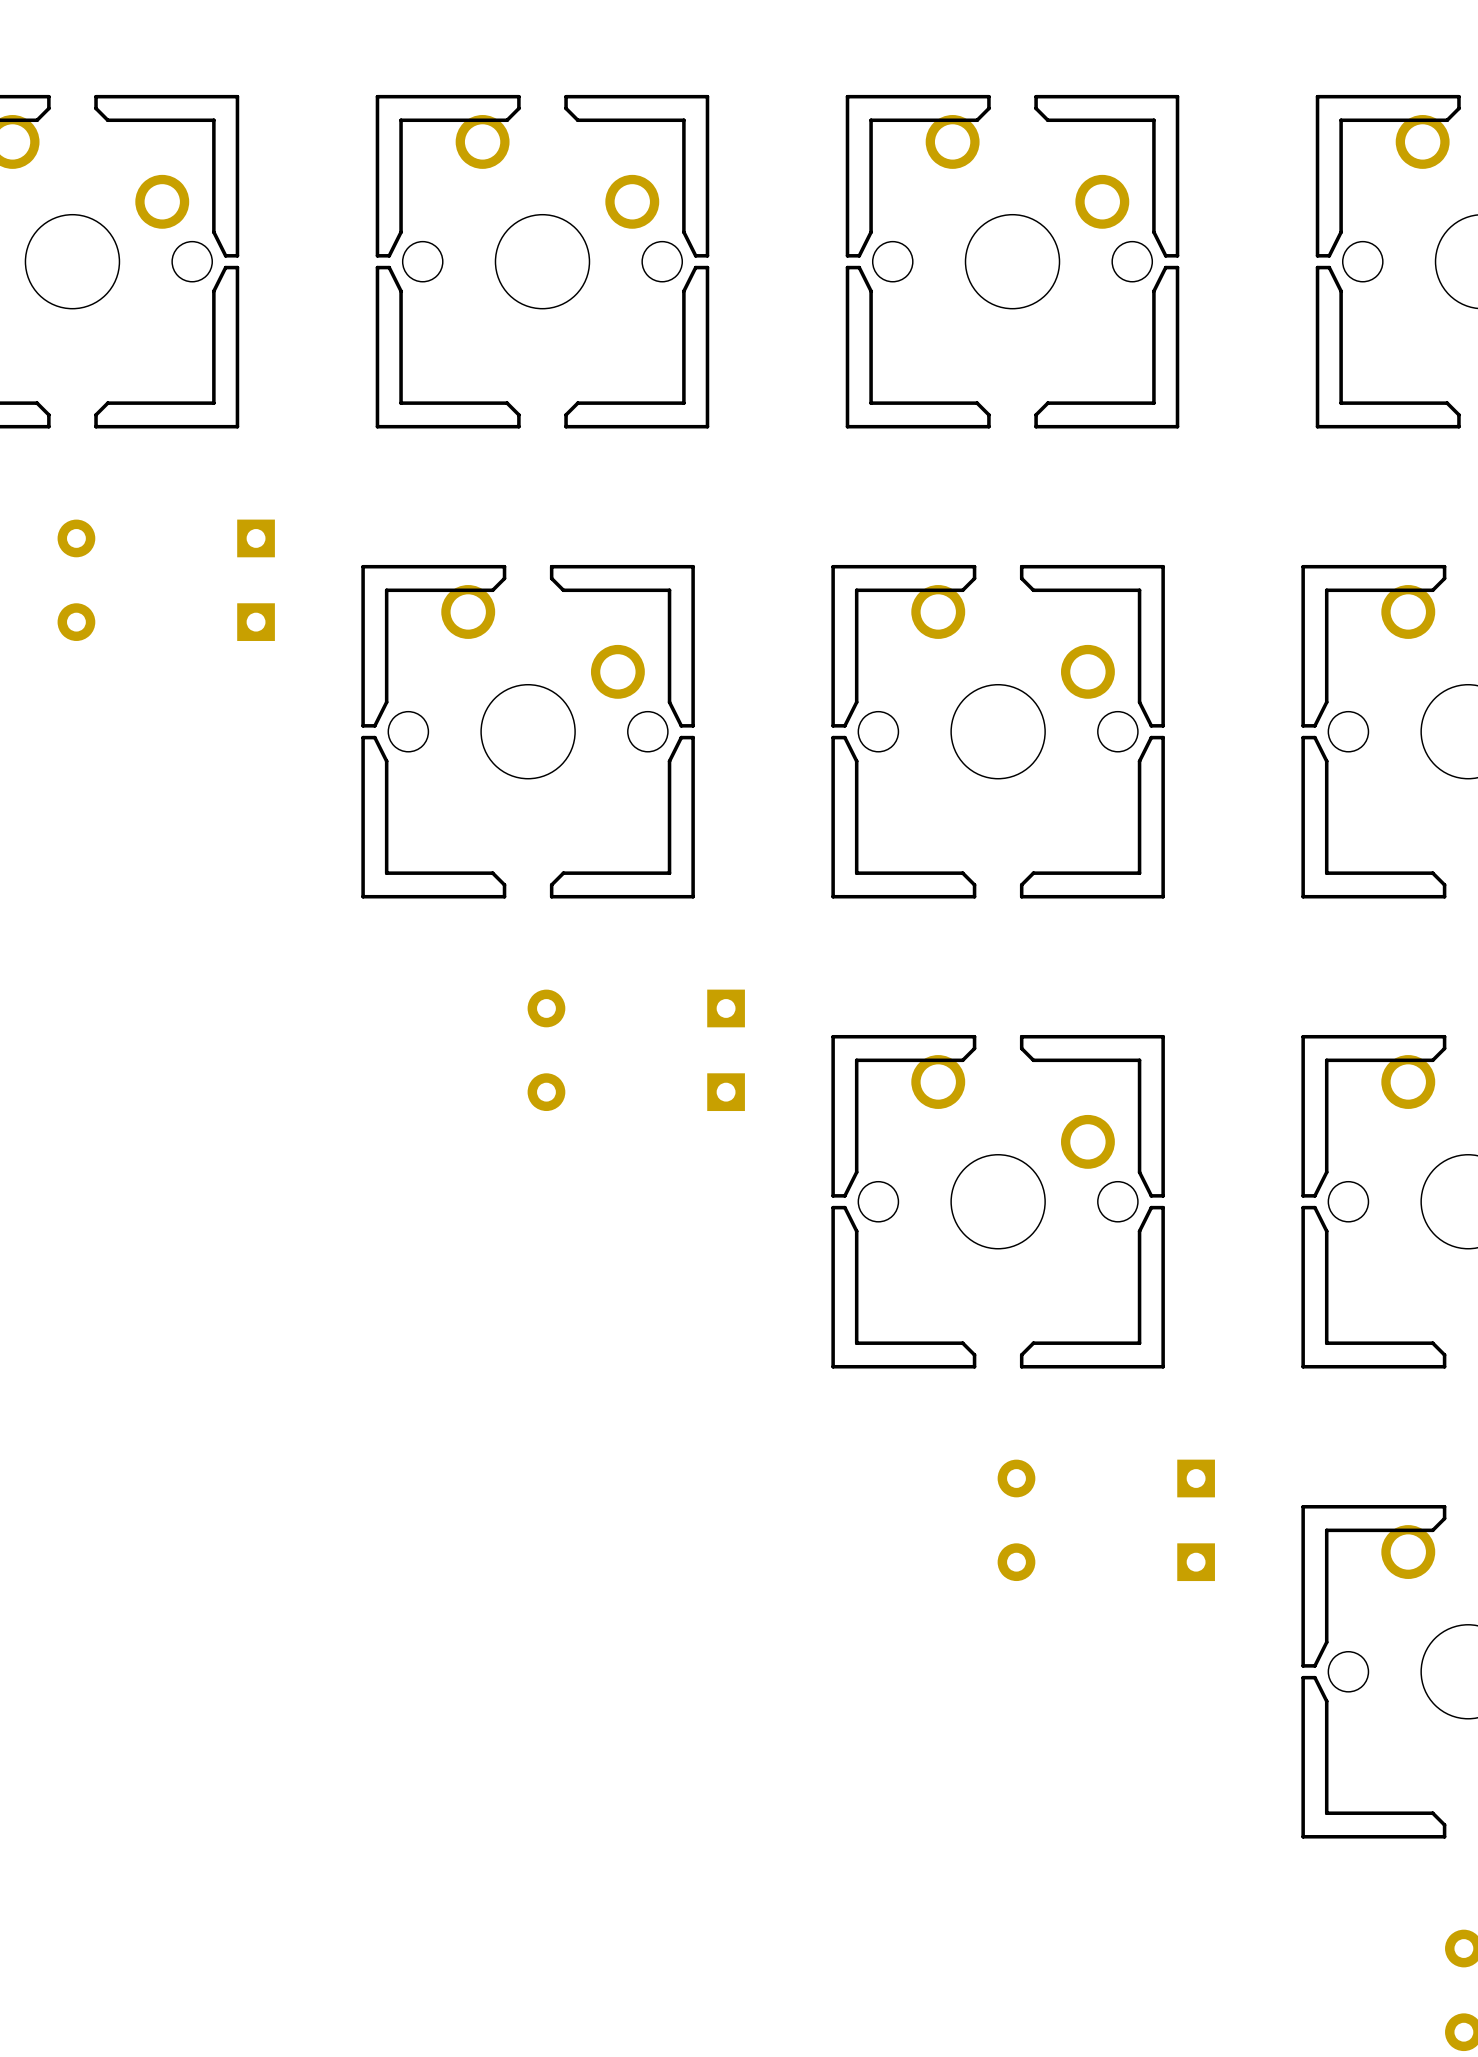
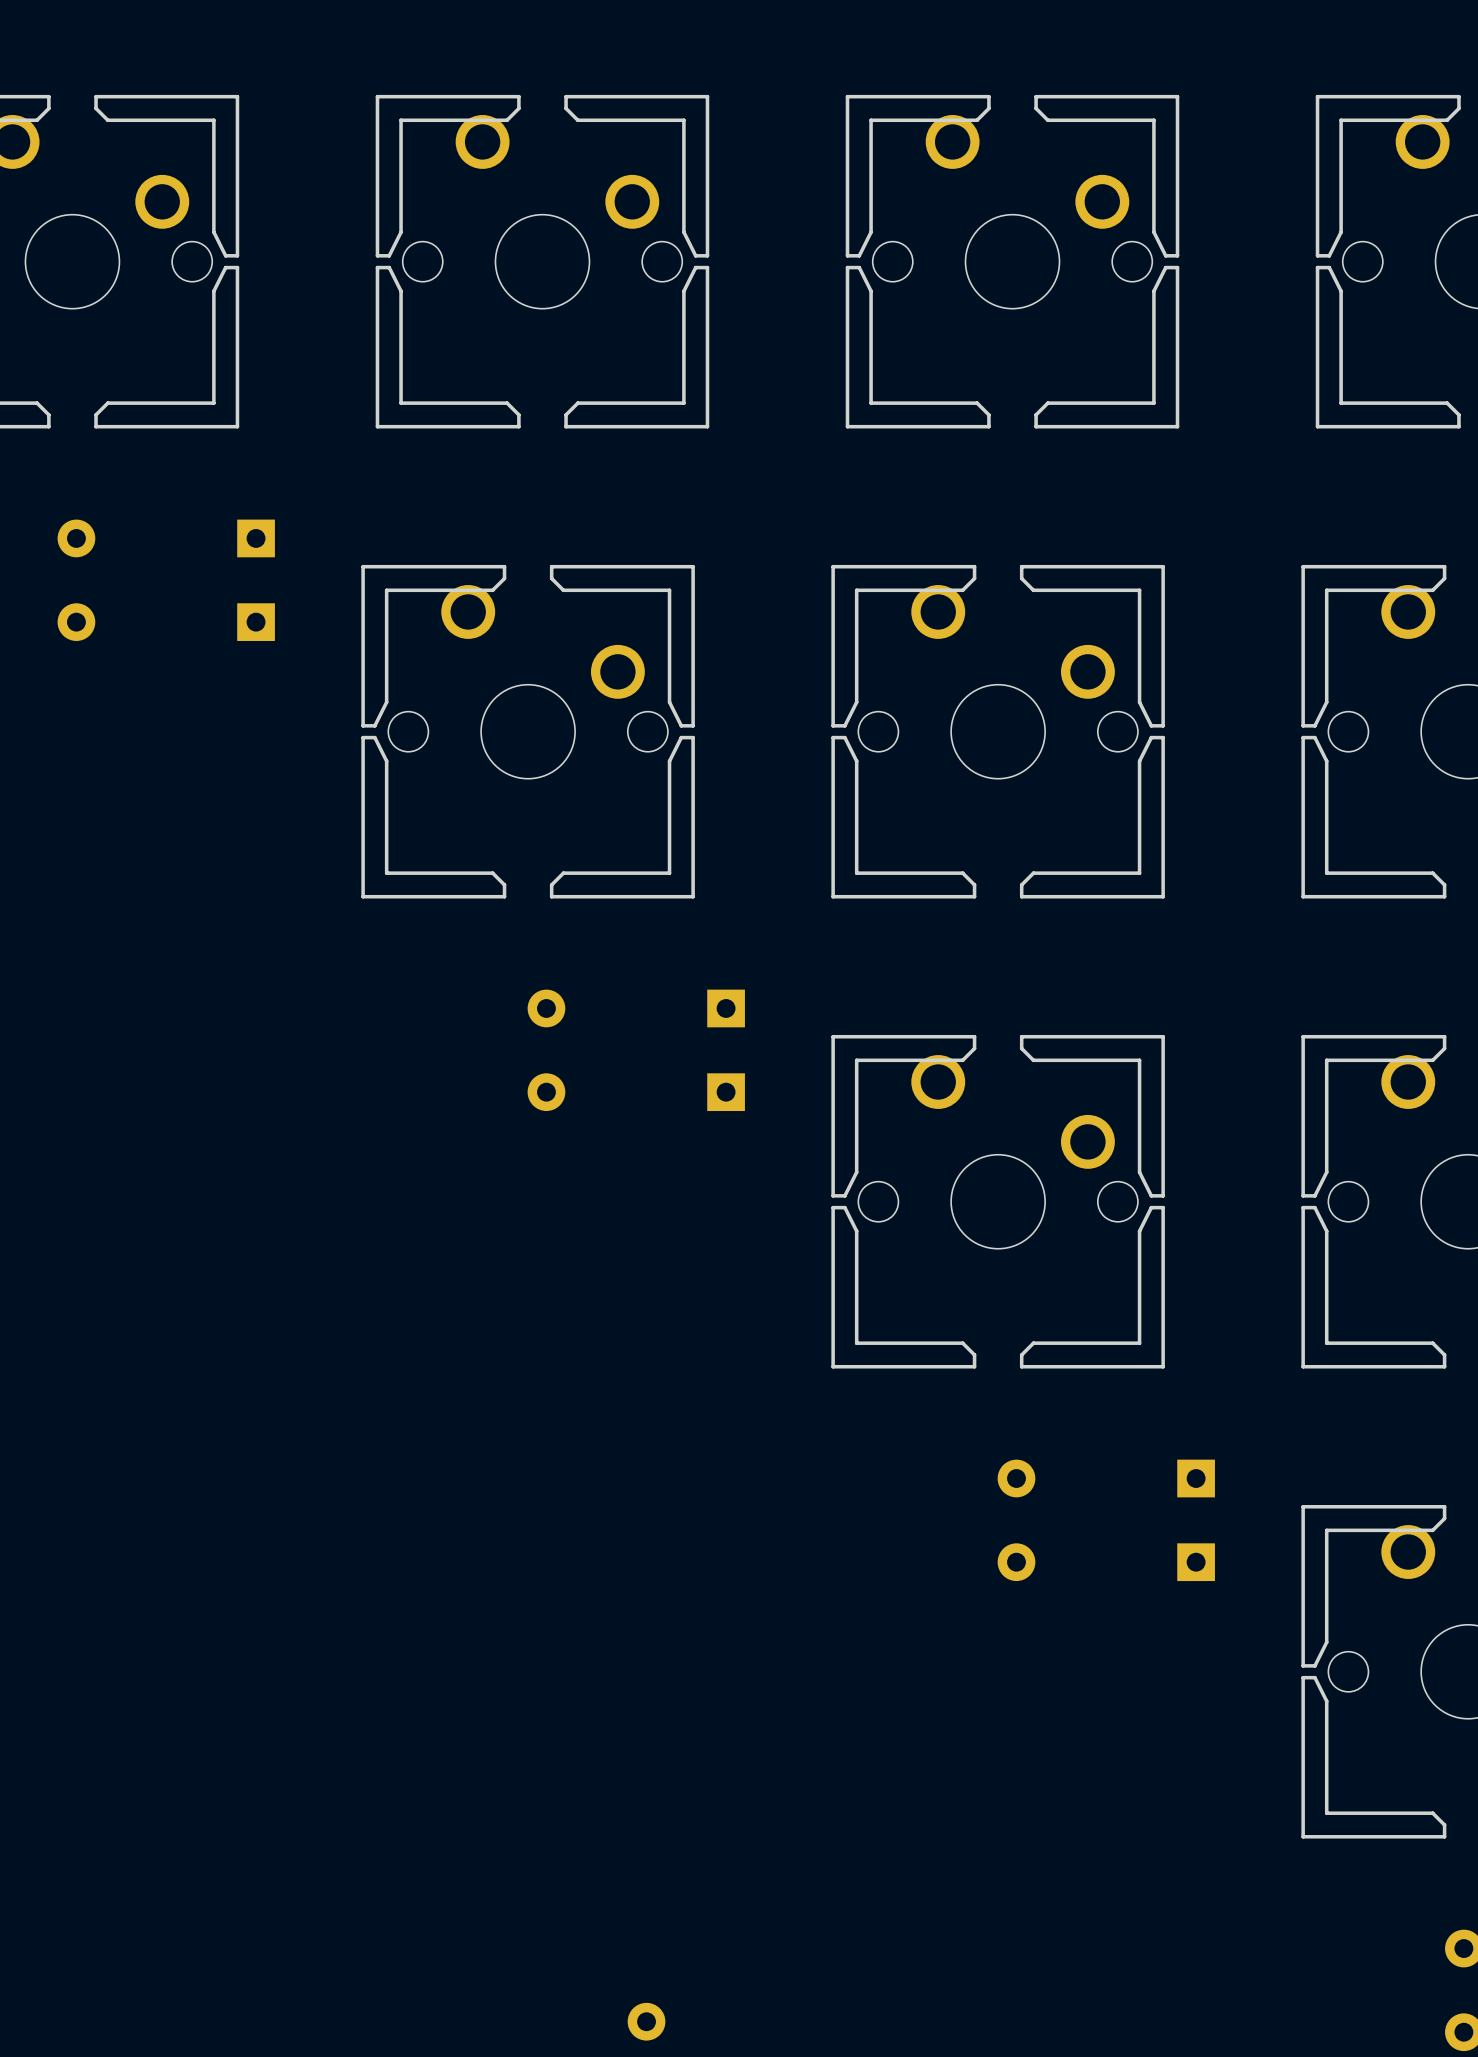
part: none -> (646, 2021)

